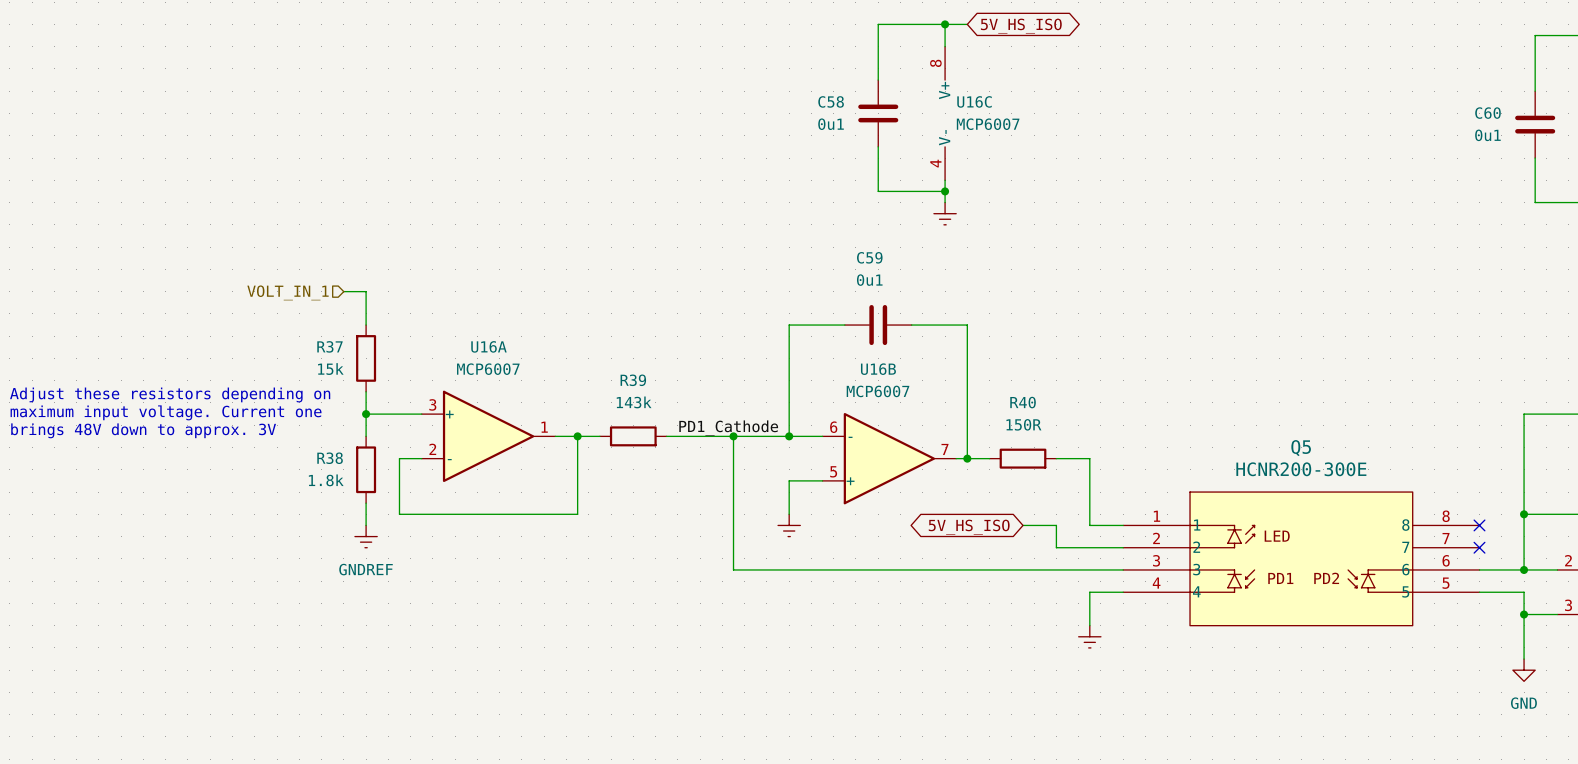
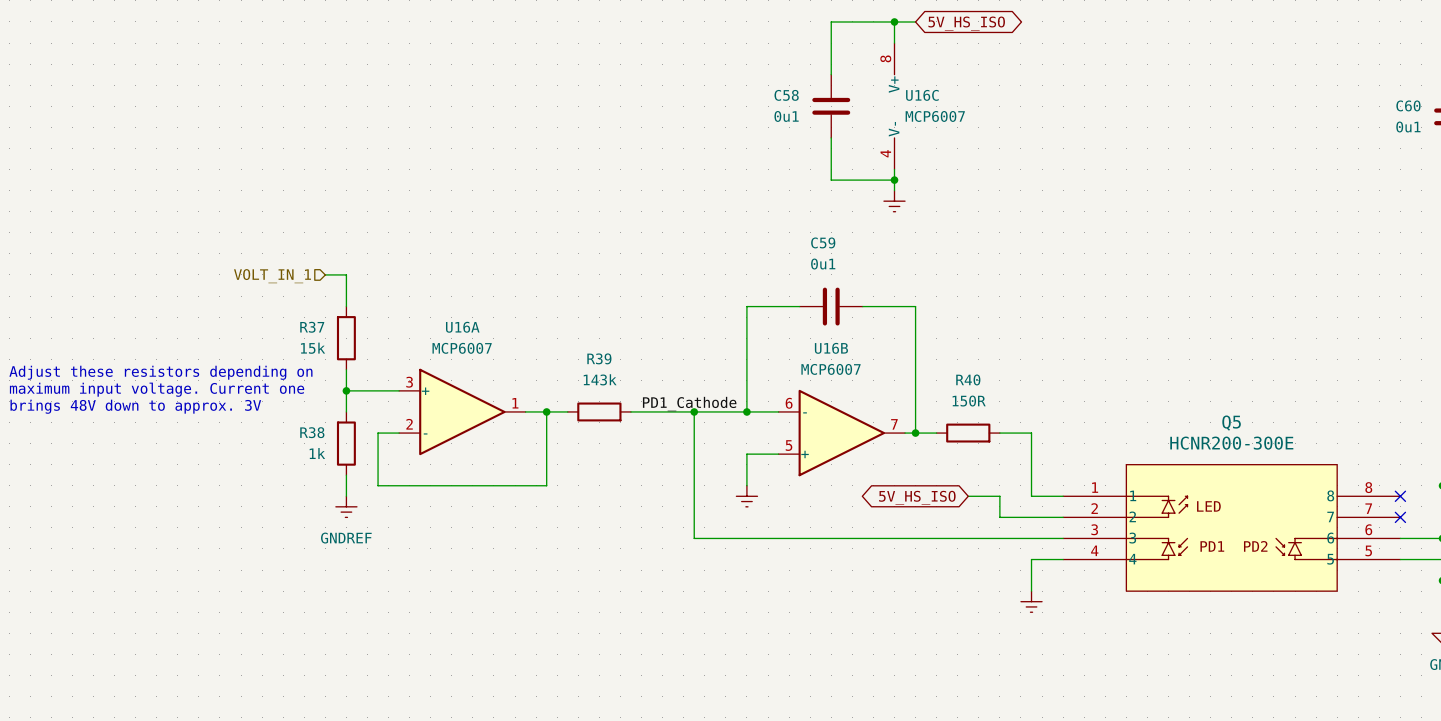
R38 value: 1.8k (326, 480) -> 1k (317, 453)

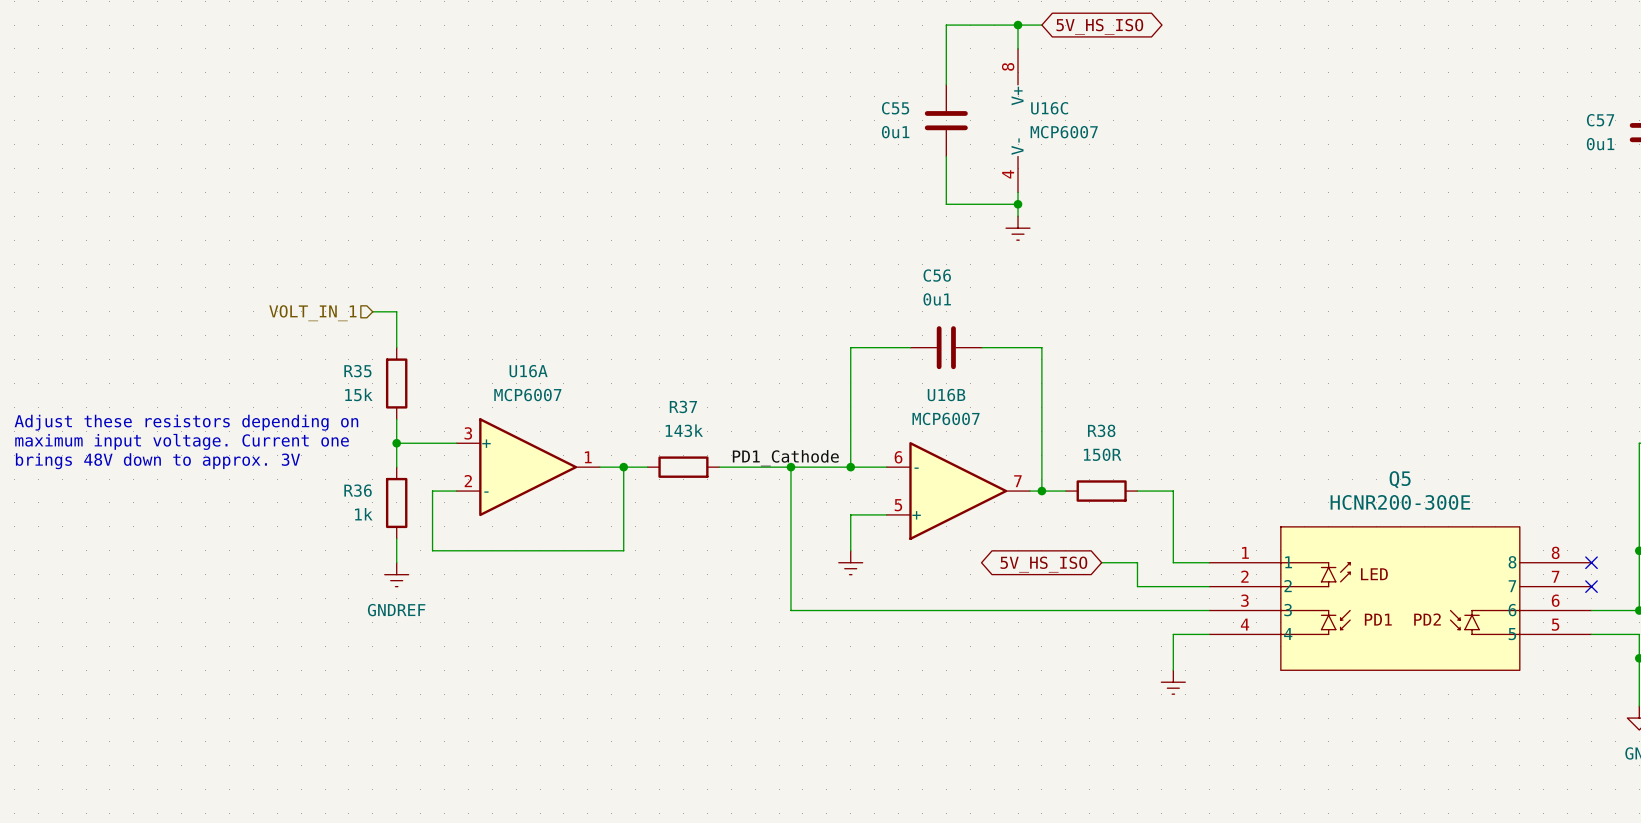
C58 name: C58 (786, 95) -> C55 (895, 108)
C60 name: C60 (1408, 105) -> C57 (1600, 120)
C59 name: C59 (823, 242) -> C56 (937, 275)
R37 name: R37 (312, 327) -> R35 (357, 371)
R39 name: R39 (599, 358) -> R37 (683, 406)
R40 name: R40 (968, 379) -> R38 (1101, 430)
R38 name: R38 (312, 432) -> R36 (358, 490)

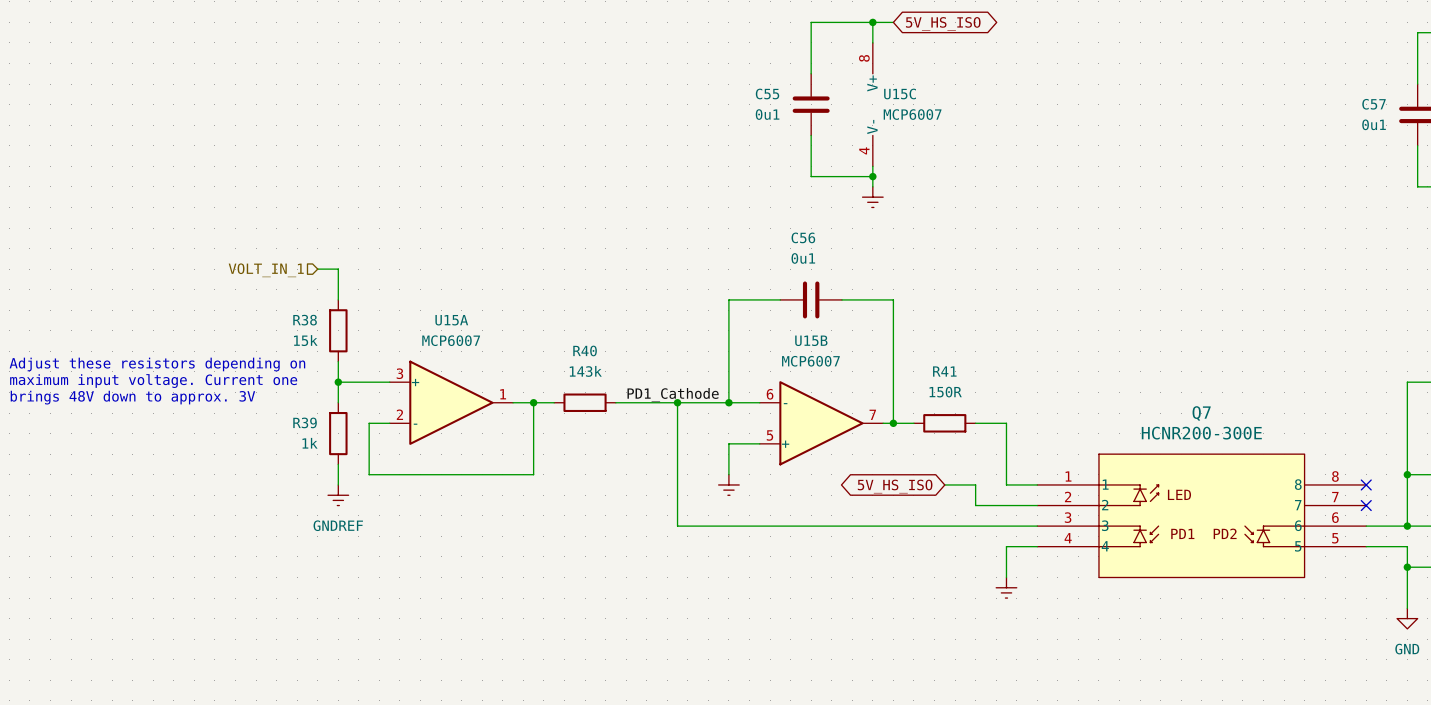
U16C name: U16C (1049, 108) -> U15C (900, 93)
R35 name: R35 (357, 371) -> R38 (305, 320)
U16A name: U16A (528, 371) -> U15A (451, 320)
U16B name: U16B (946, 395) -> U15B (811, 340)
R37 name: R37 (683, 406) -> R40 (585, 350)
R38 name: R38 (1101, 430) -> R41 (944, 371)
Q5 name: Q5 (1400, 479) -> Q7 (1201, 413)
R36 name: R36 (358, 490) -> R39 (305, 422)

